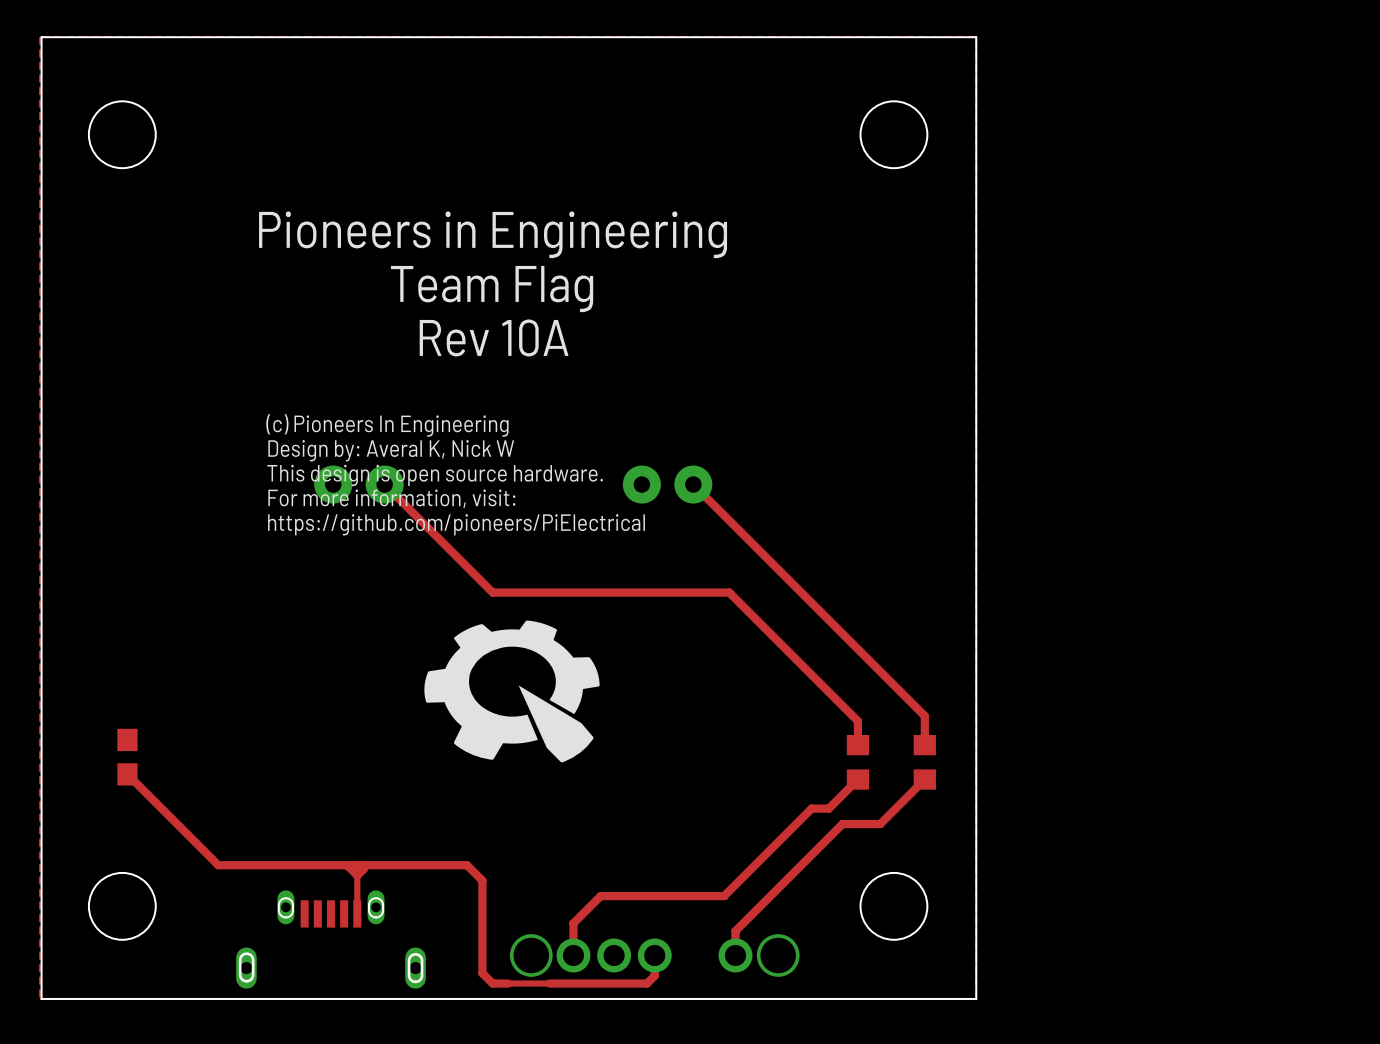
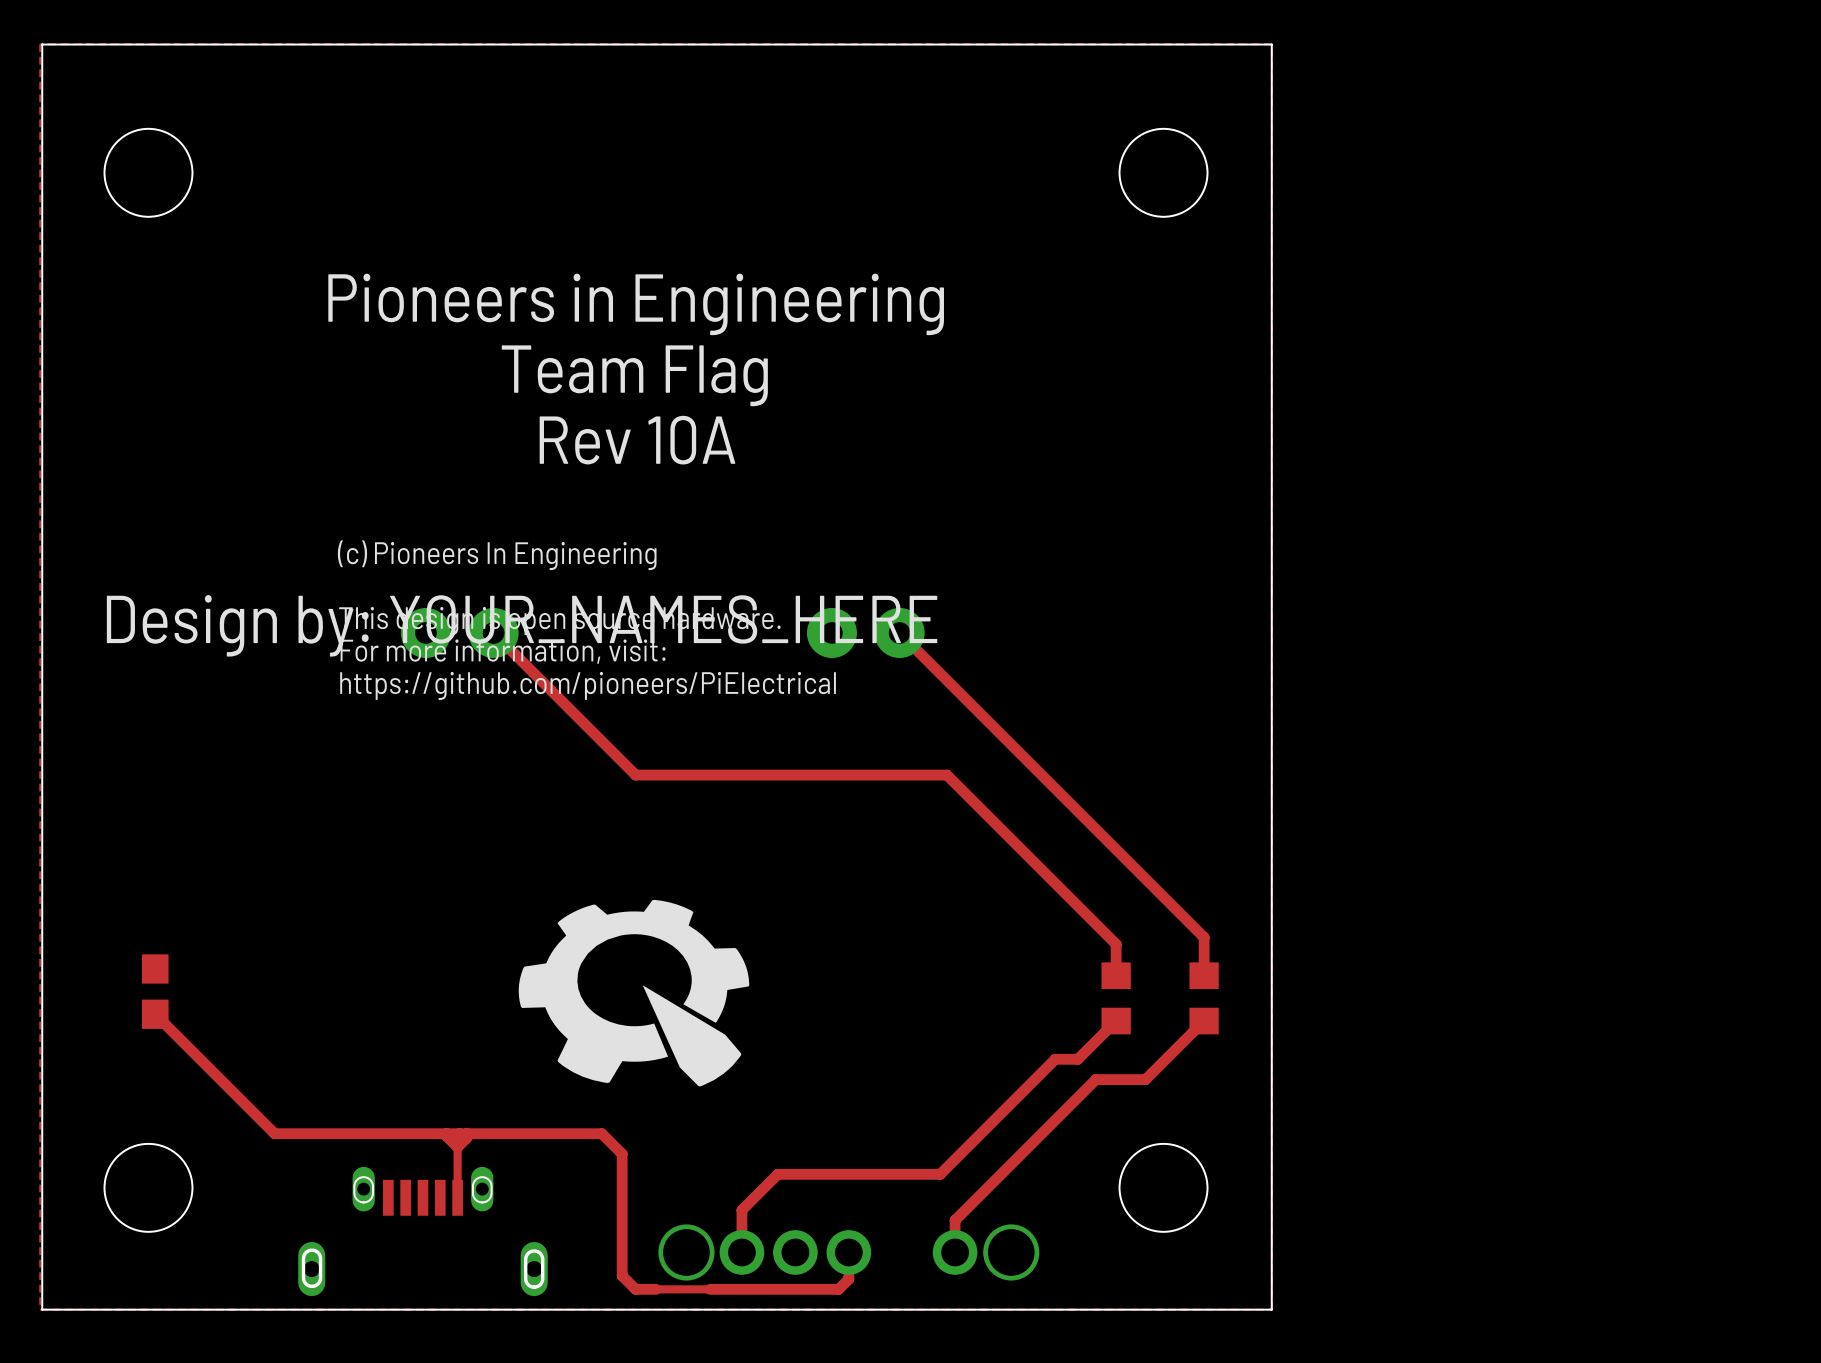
text: Design by: Averal K, Nick W (391, 450) -> none
text: none -> Design by: YOUR_NAMES_HERE (522, 625)
drawing position: (511, 691) -> (633, 993)

